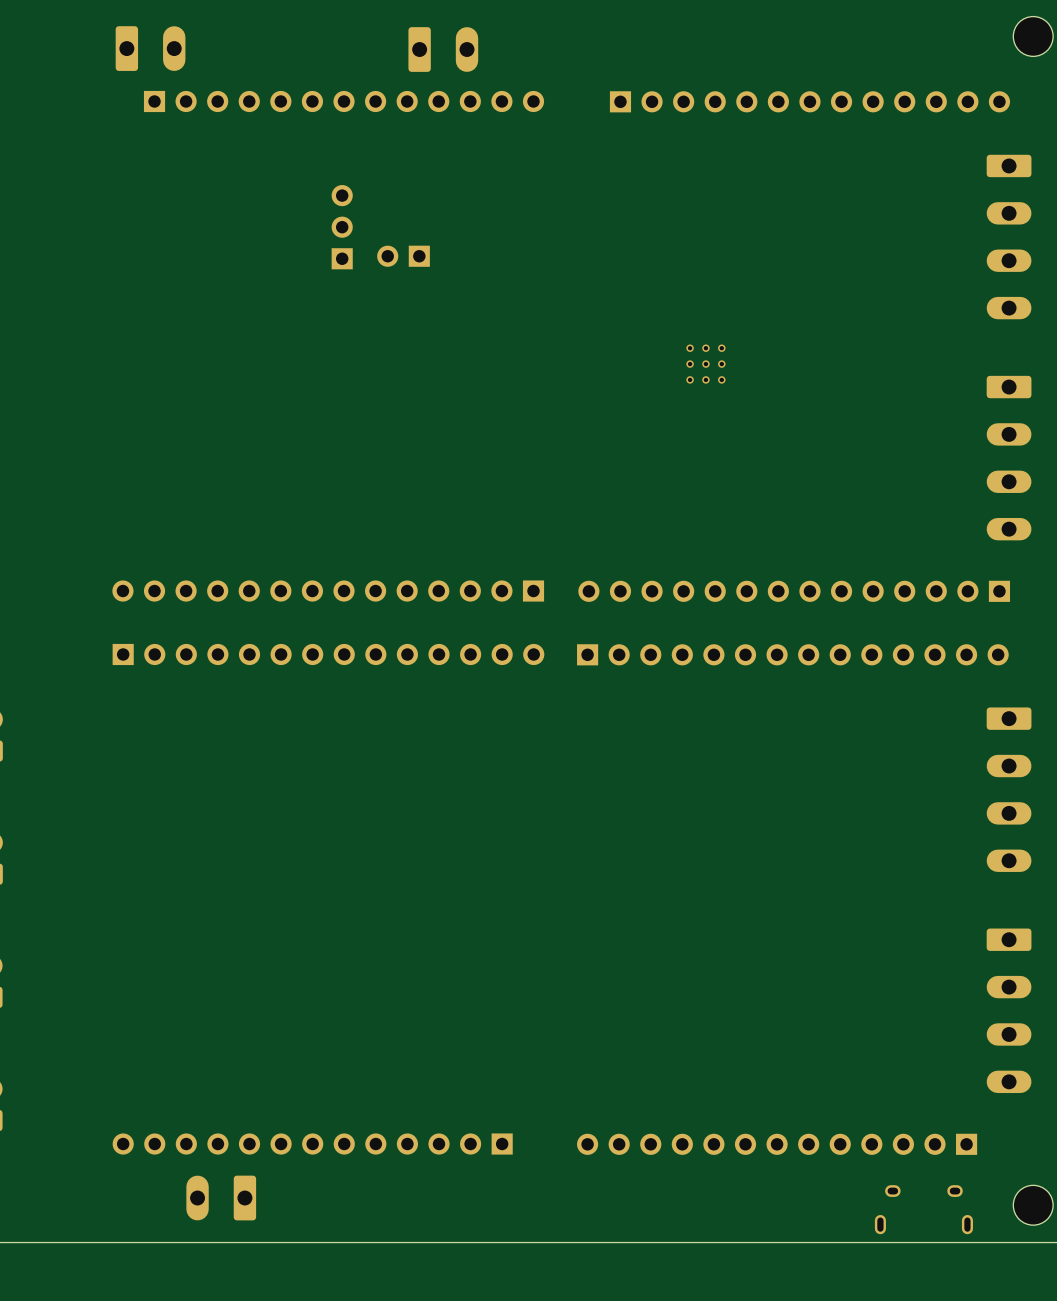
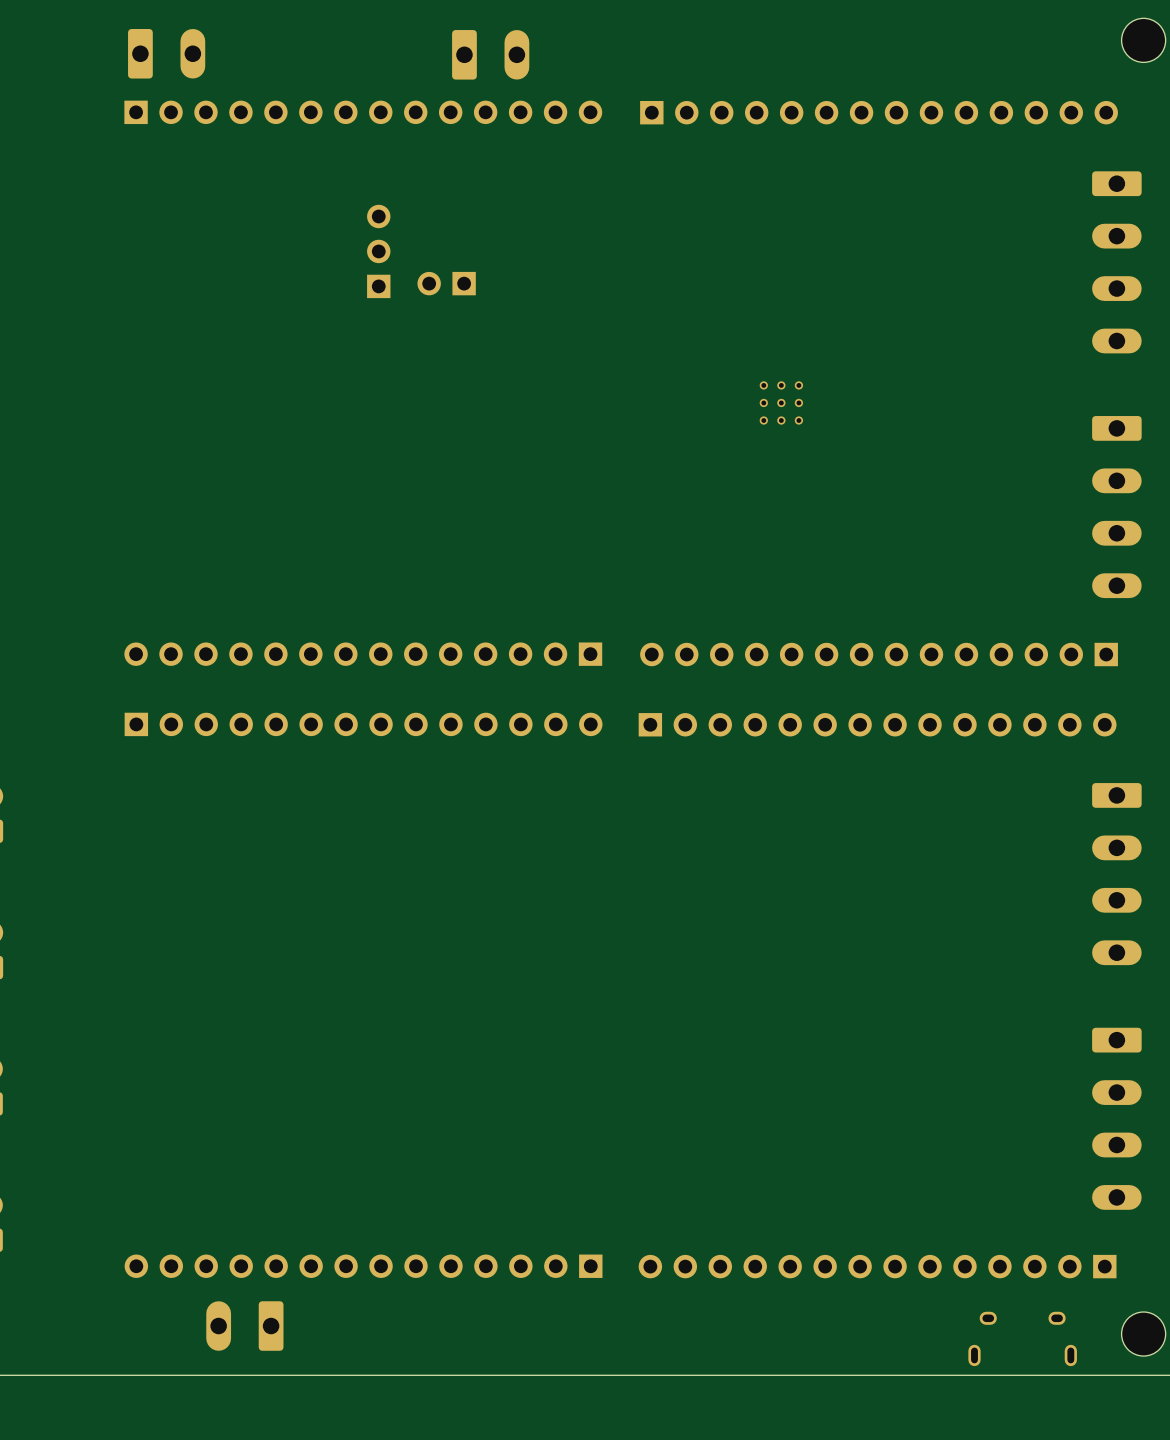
part: none -> (363, 112)
part: (344, 101) -> none
part: none -> (879, 112)
part: (809, 101) -> none
part: (312, 1144) -> none
part: none -> (363, 1266)
part: (777, 1144) -> none
part: none -> (877, 1266)

